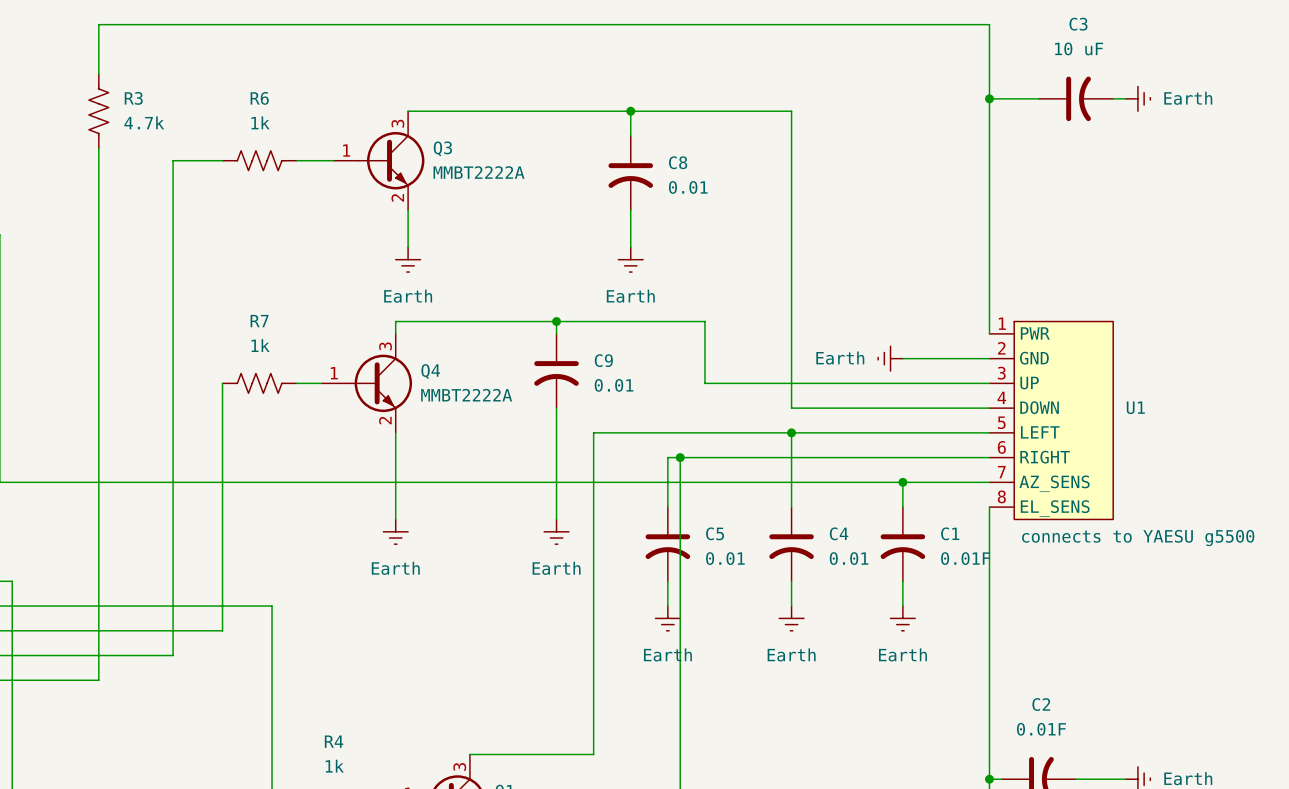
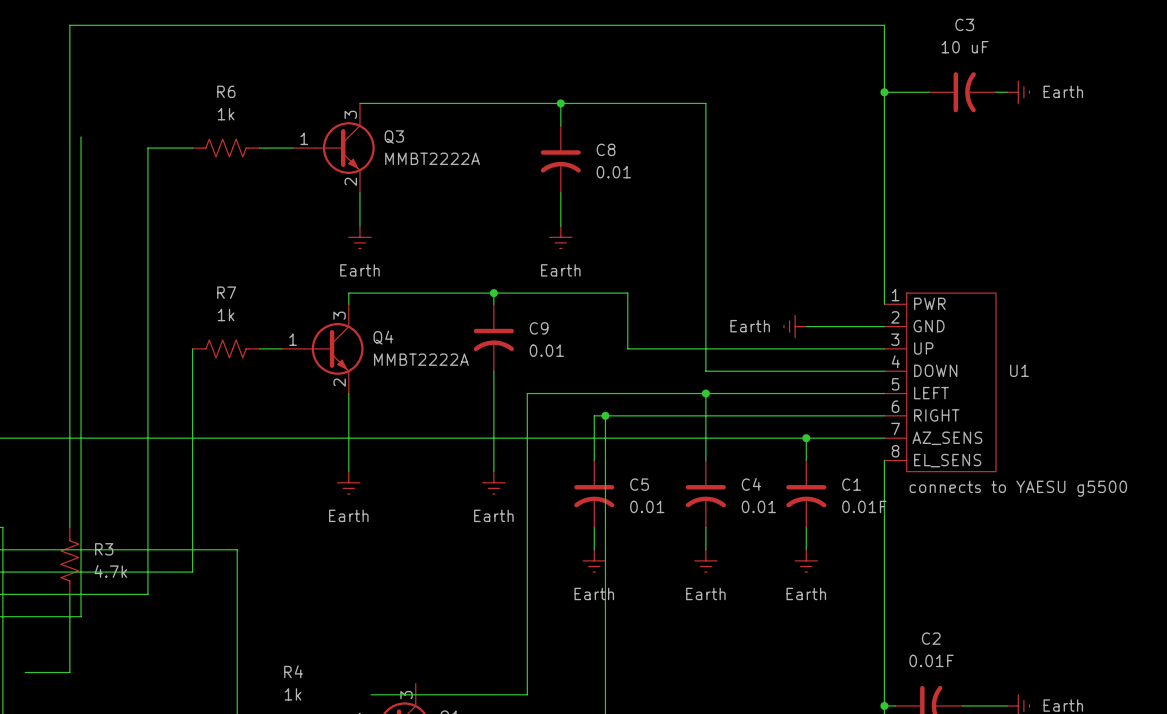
wire: (98, 24) (98, 74) -> (81, 25) (69, 25) (69, 527)
R3 position: (98, 111) -> (69, 560)
wire: none -> (69, 594) (69, 672) (25, 672)
wire: (469, 754) (593, 754) -> (371, 694) (527, 694) (527, 683)

